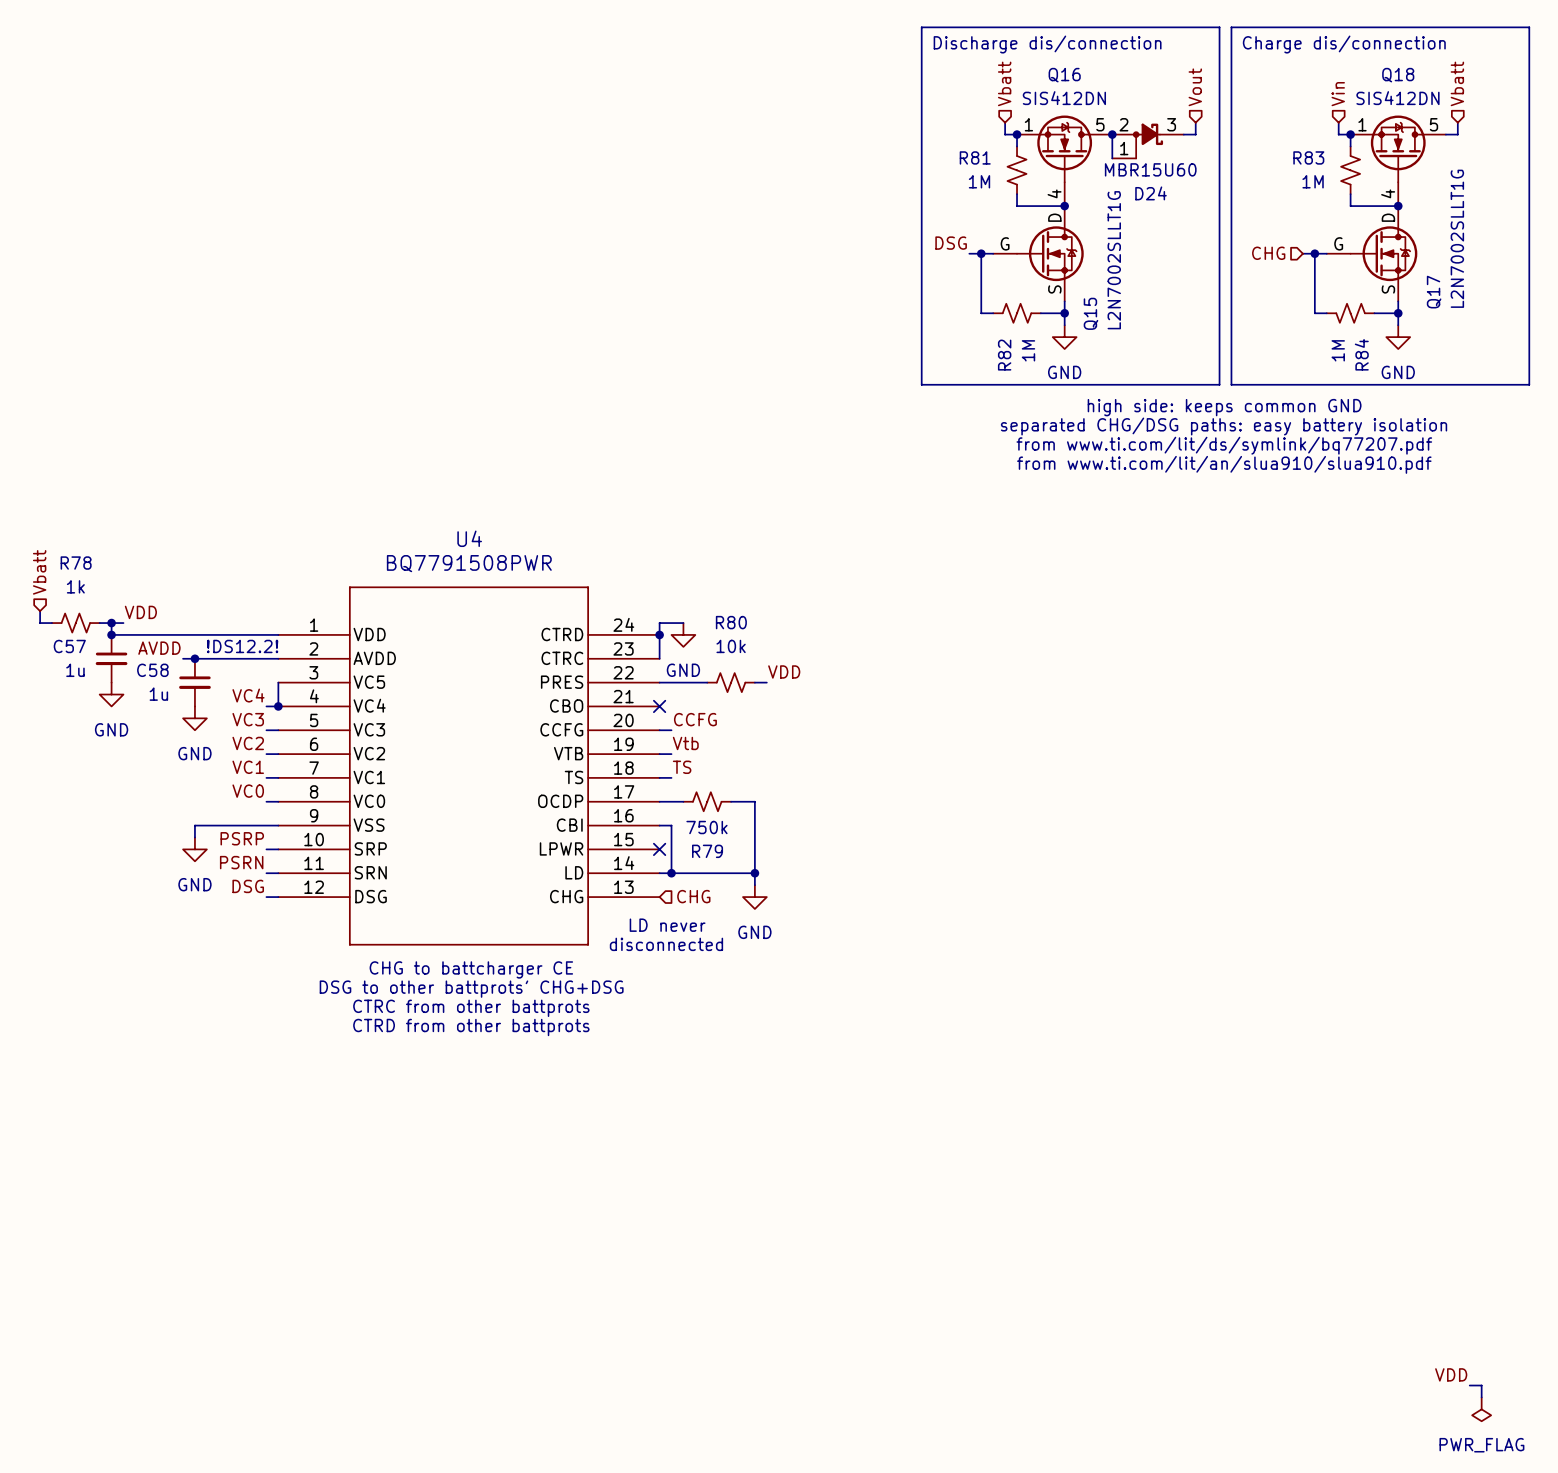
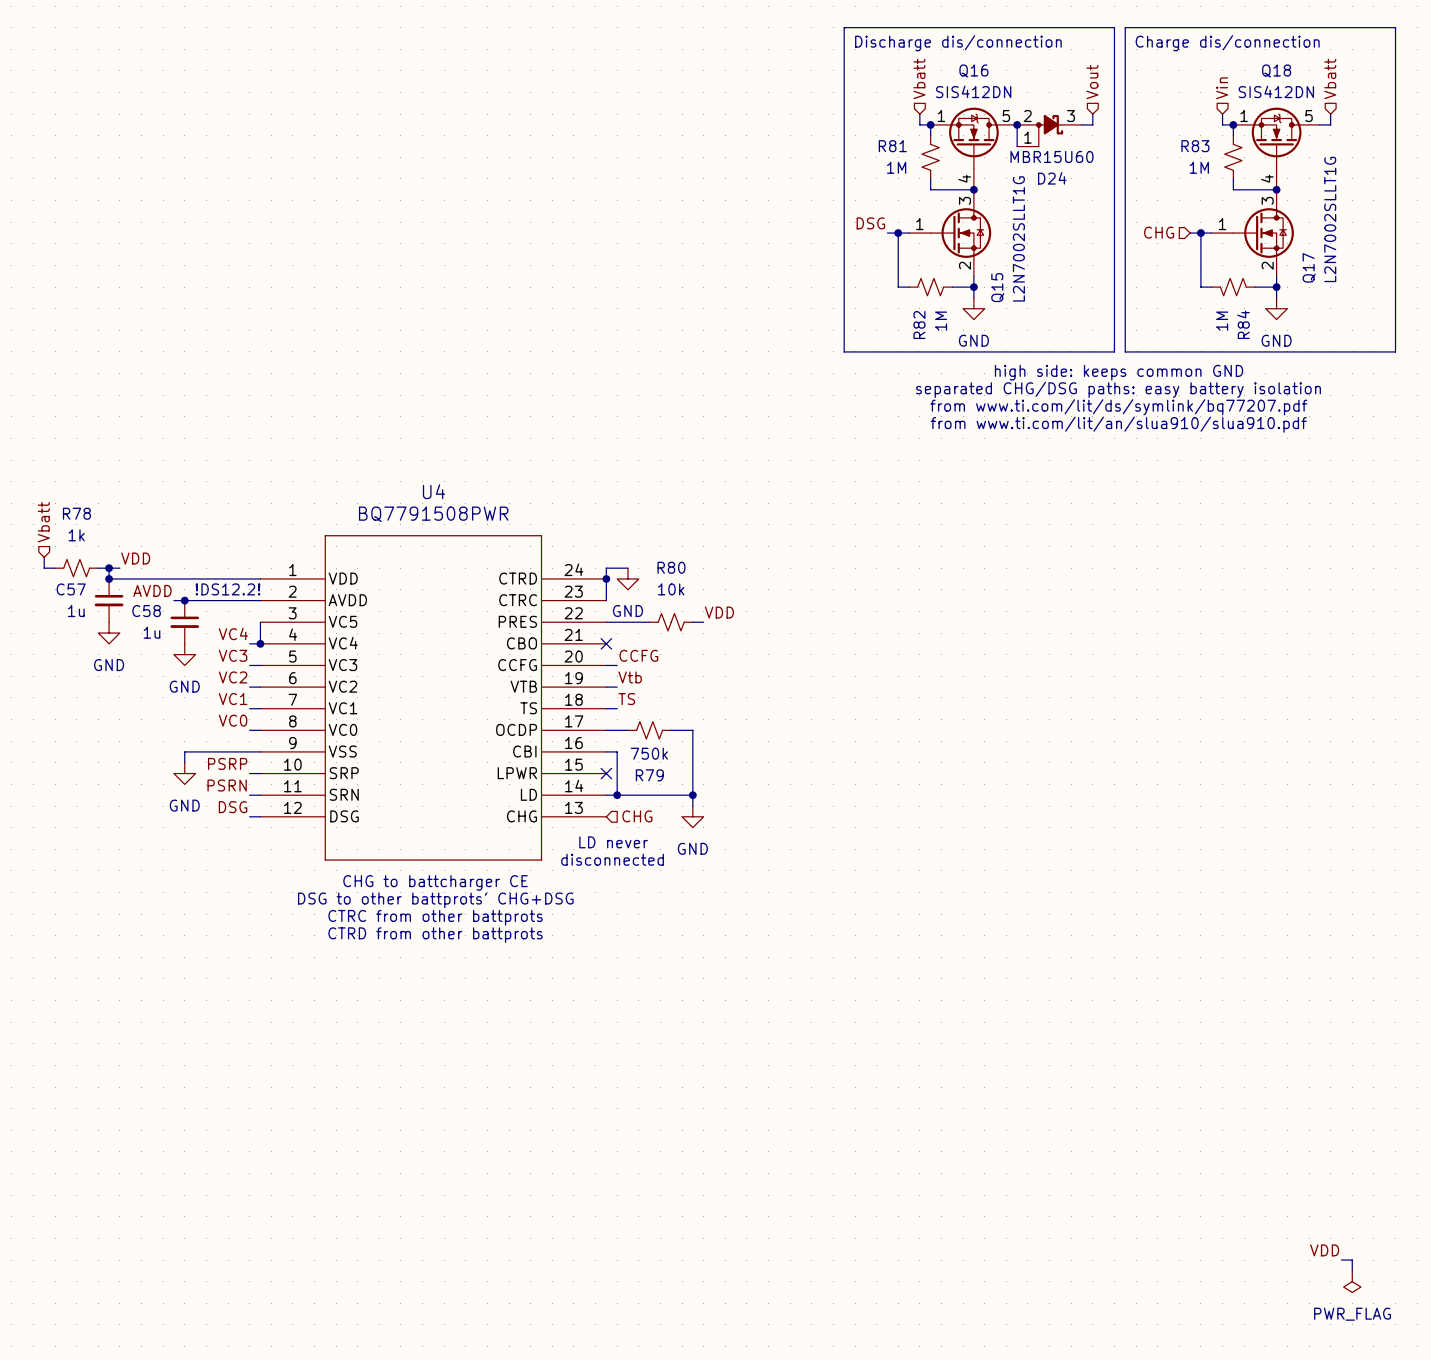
Q15 symbol: [993, 206, 1084, 302] -> [909, 189, 992, 277]
Q17 symbol: [1326, 206, 1418, 302] -> [1211, 189, 1294, 277]

